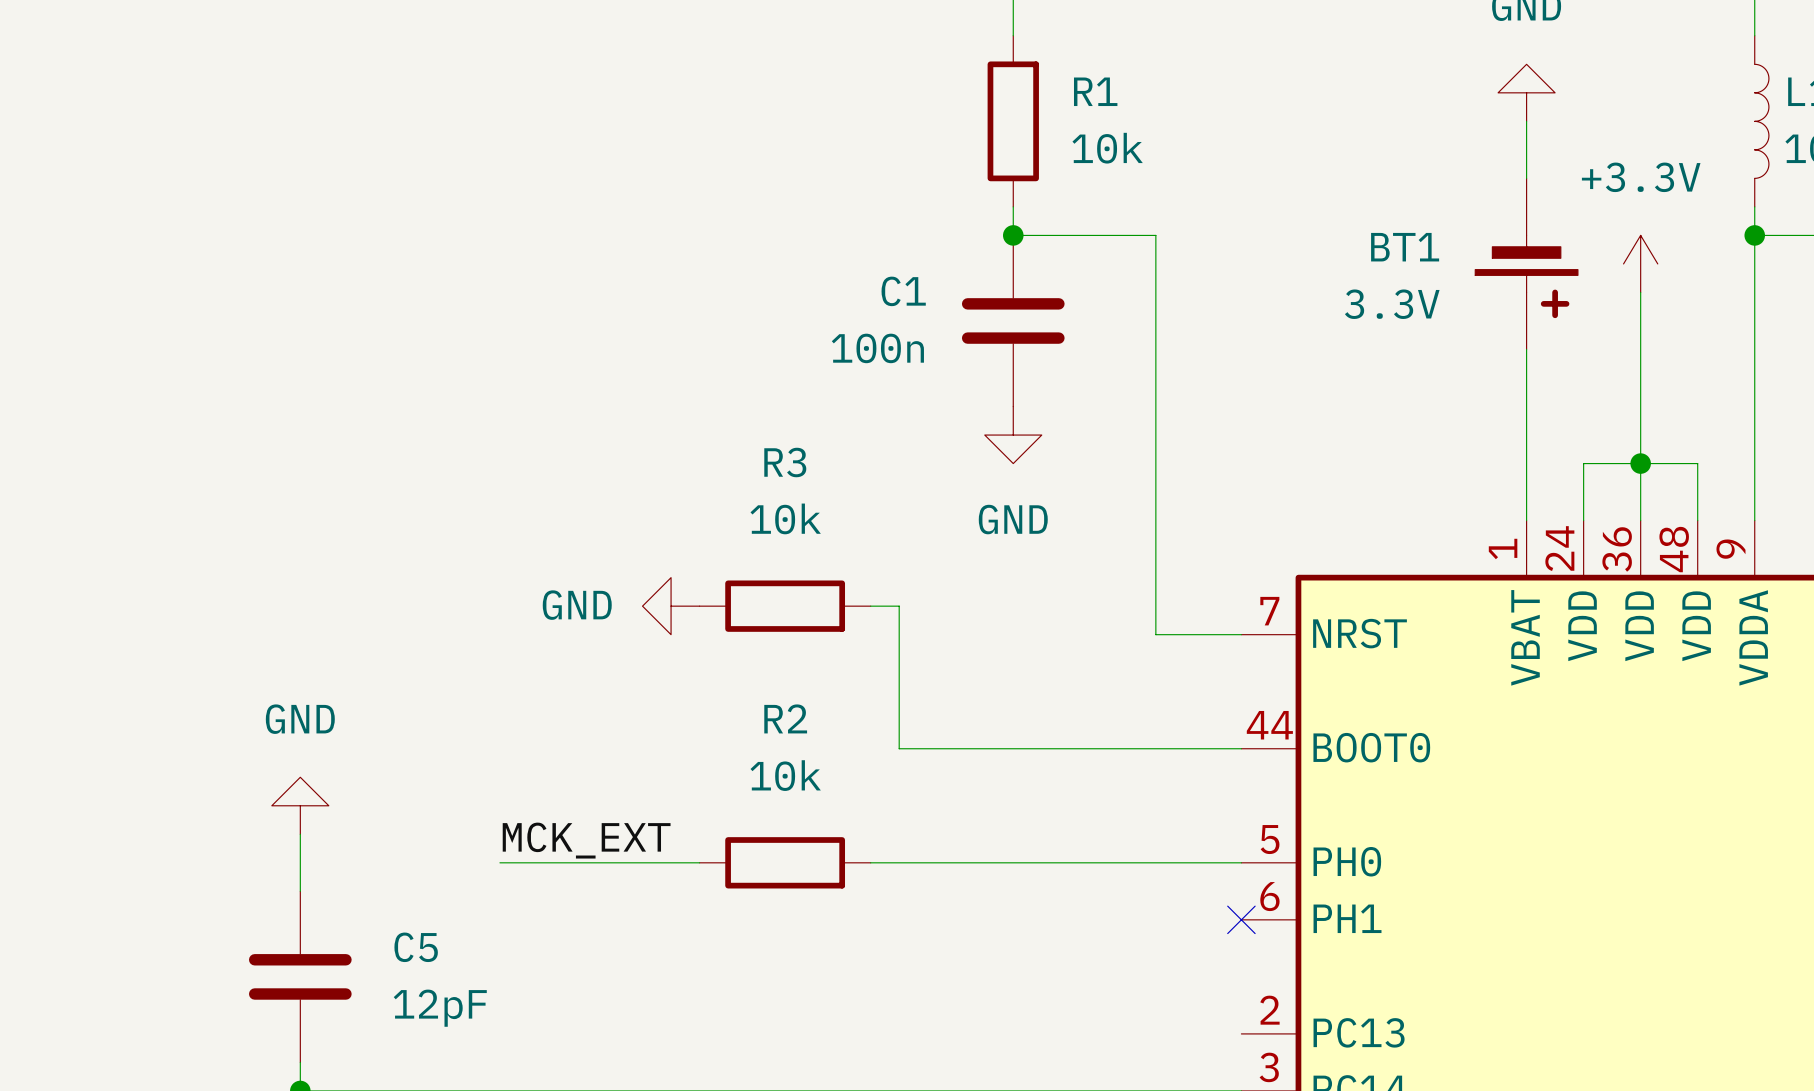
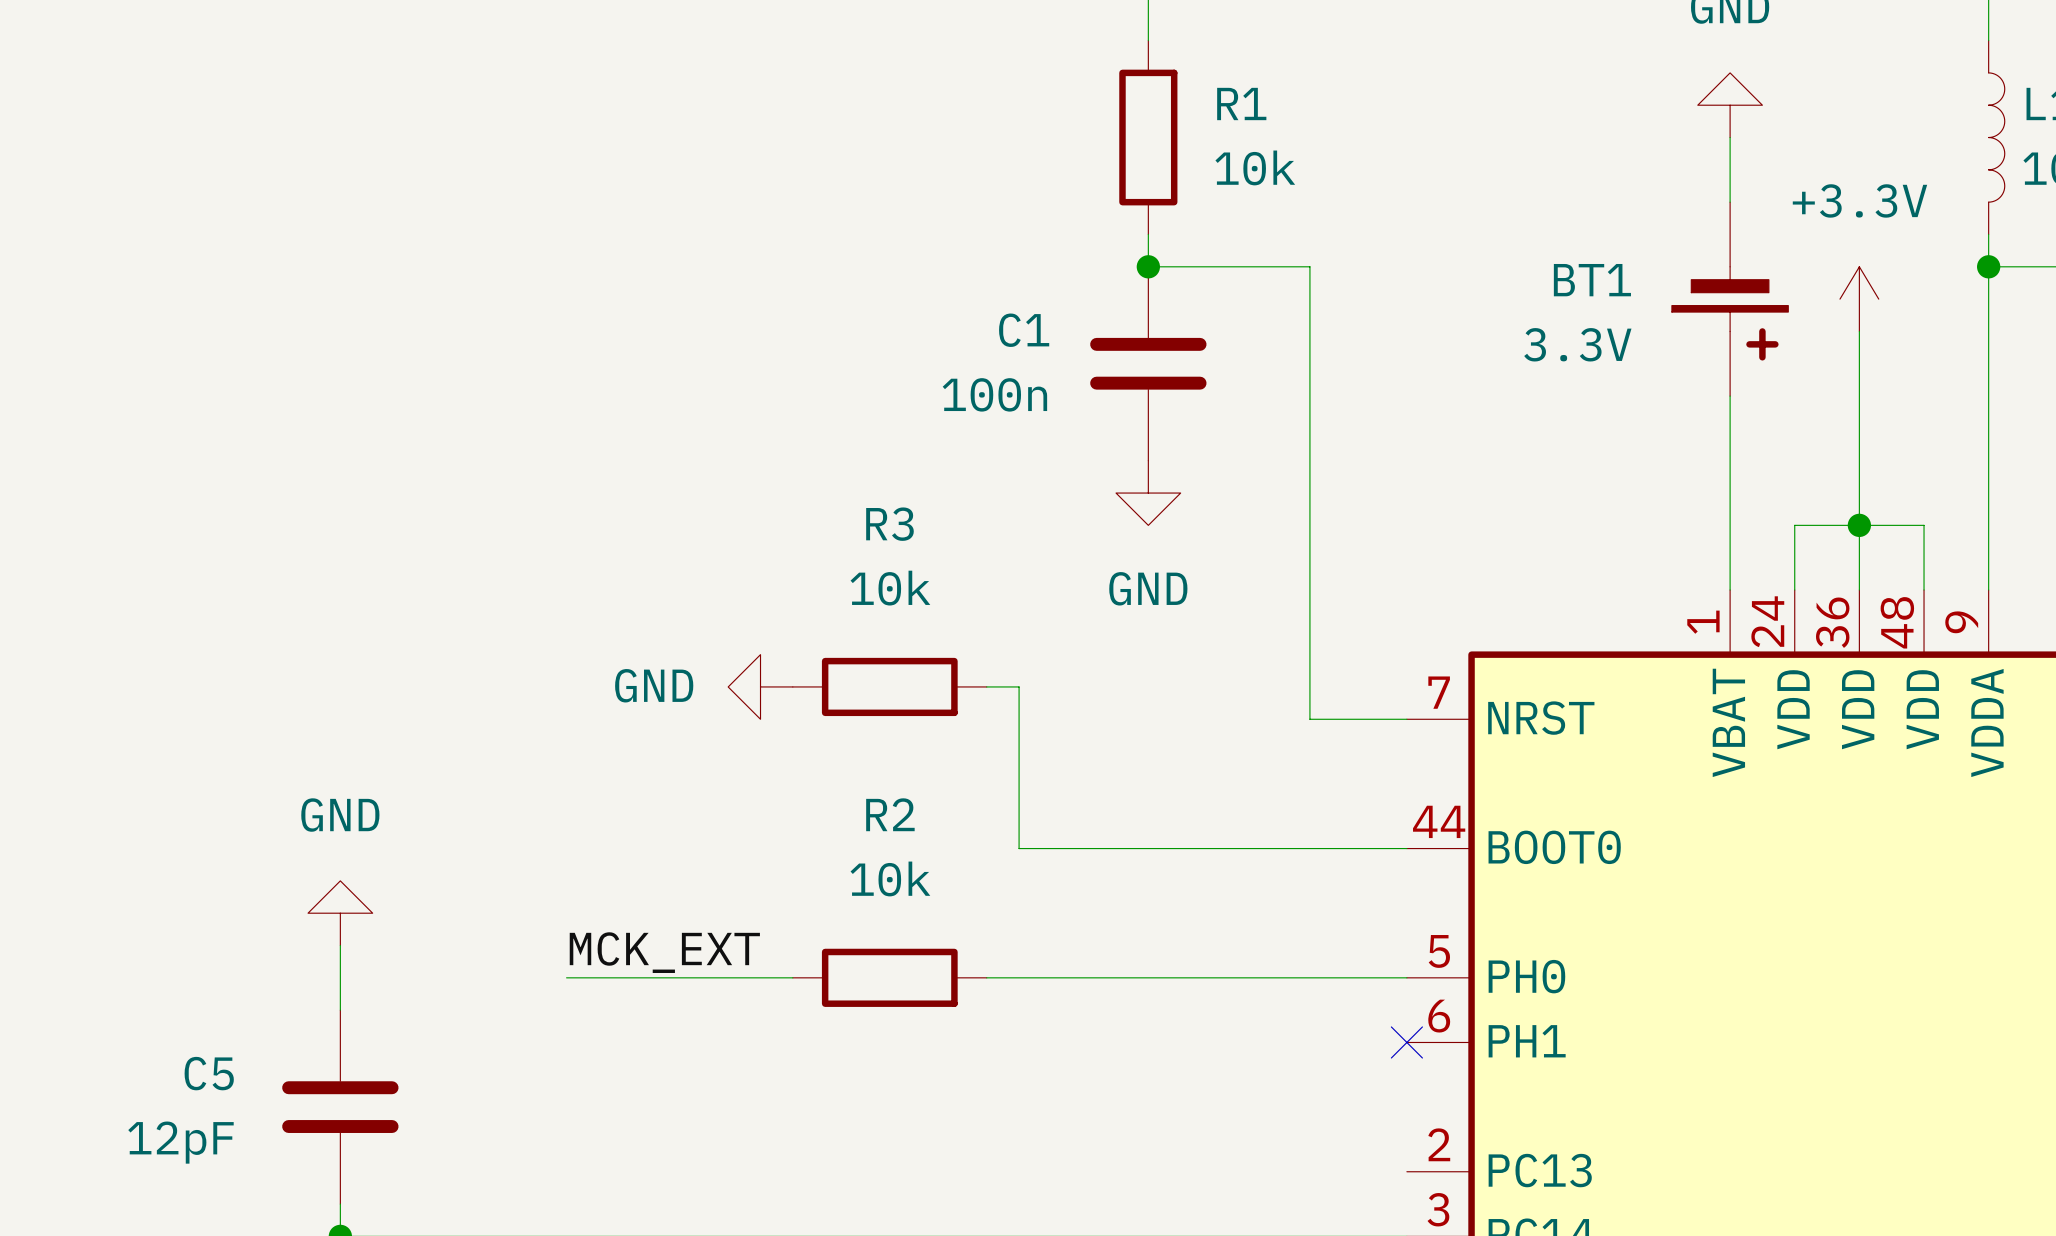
C5 name position: C5 (416, 947) -> C5 (209, 1073)
C5 value position: 12pF (440, 1008) -> 12pF (180, 1142)

